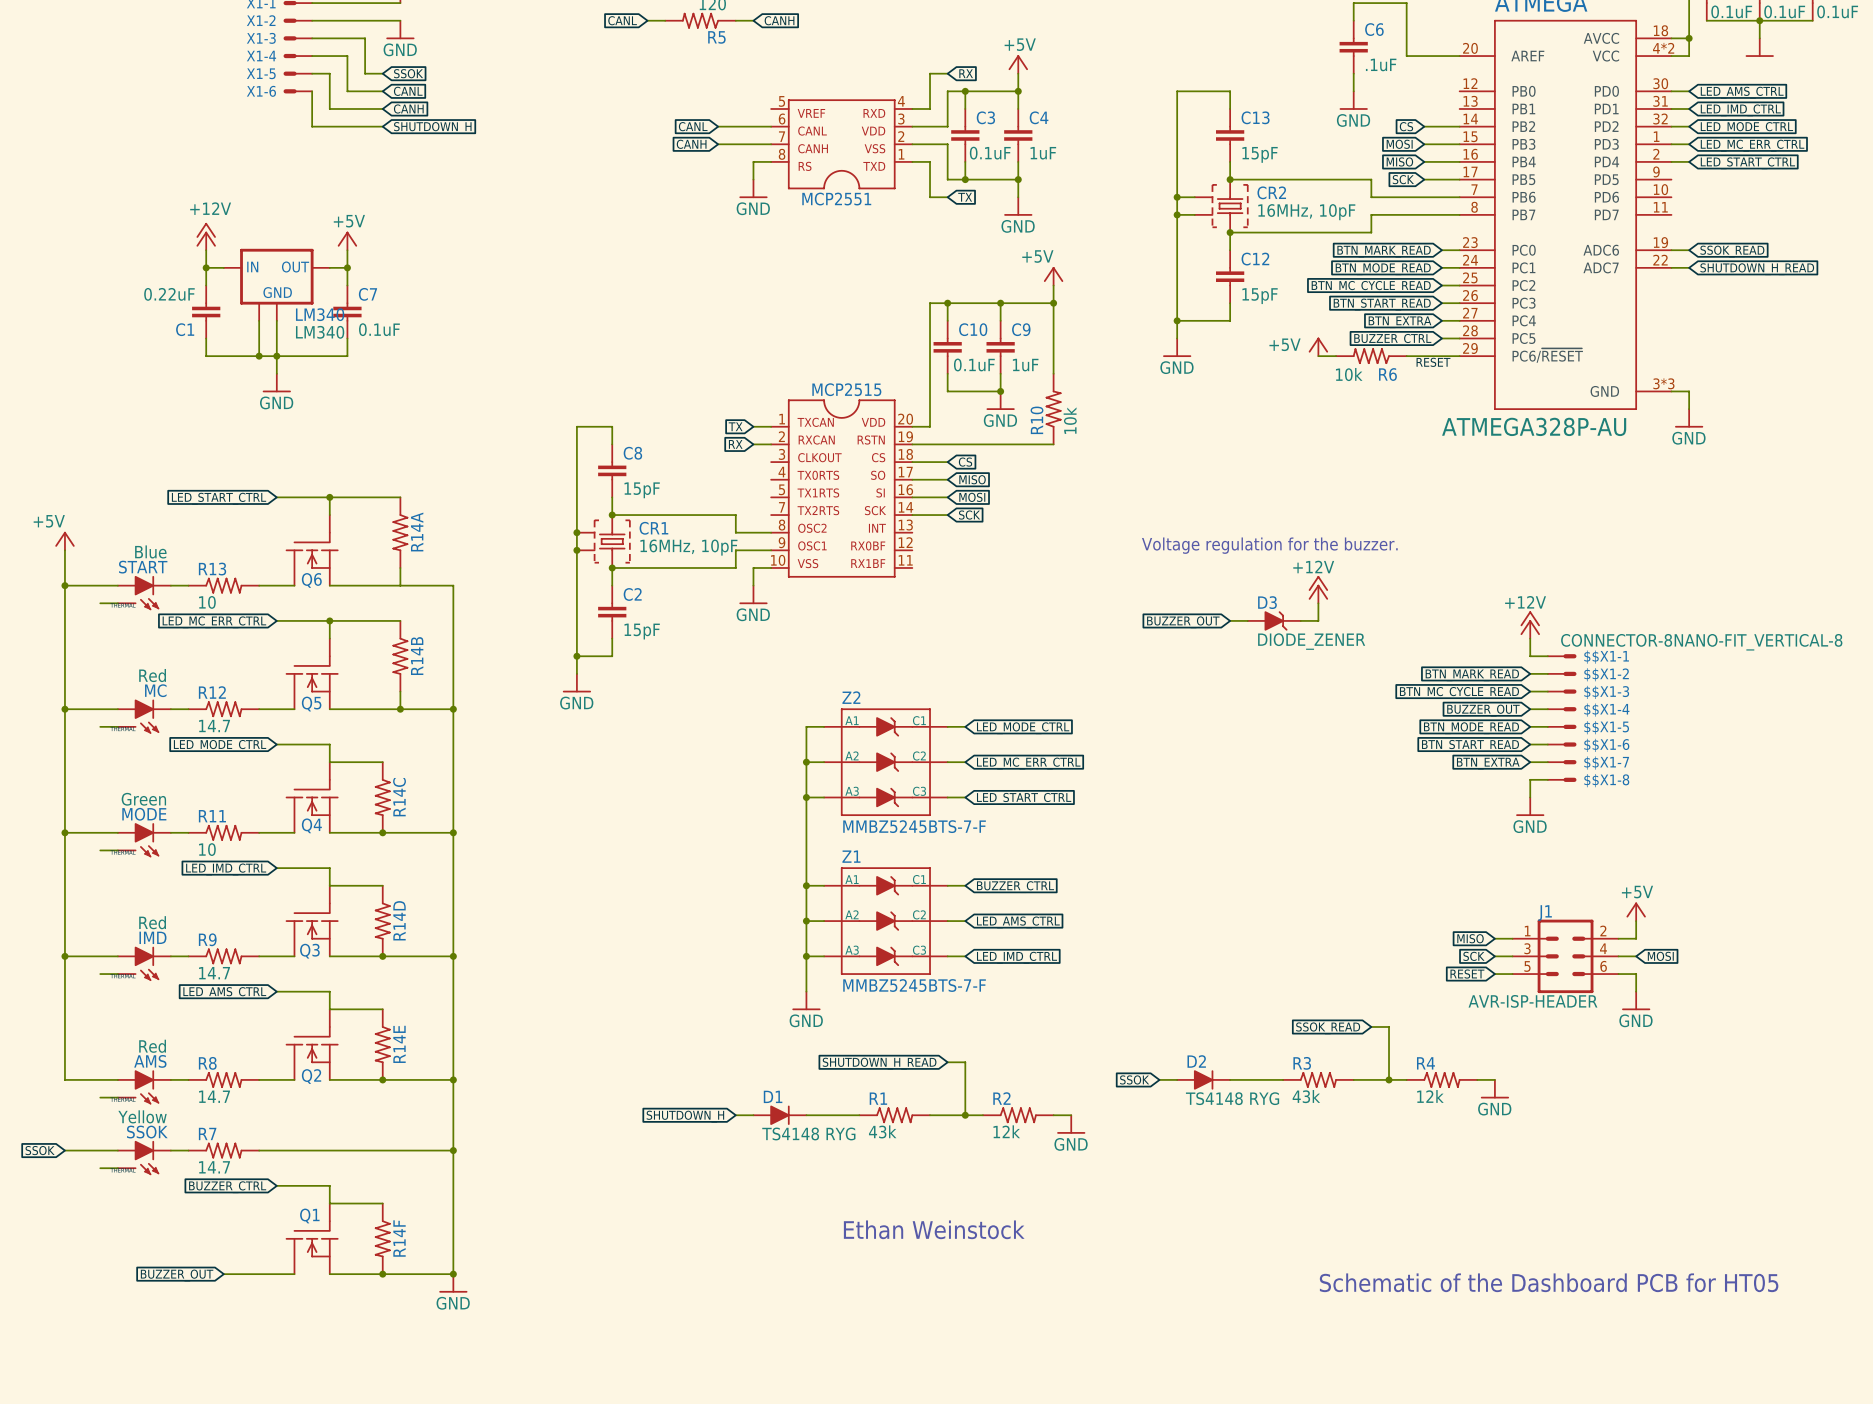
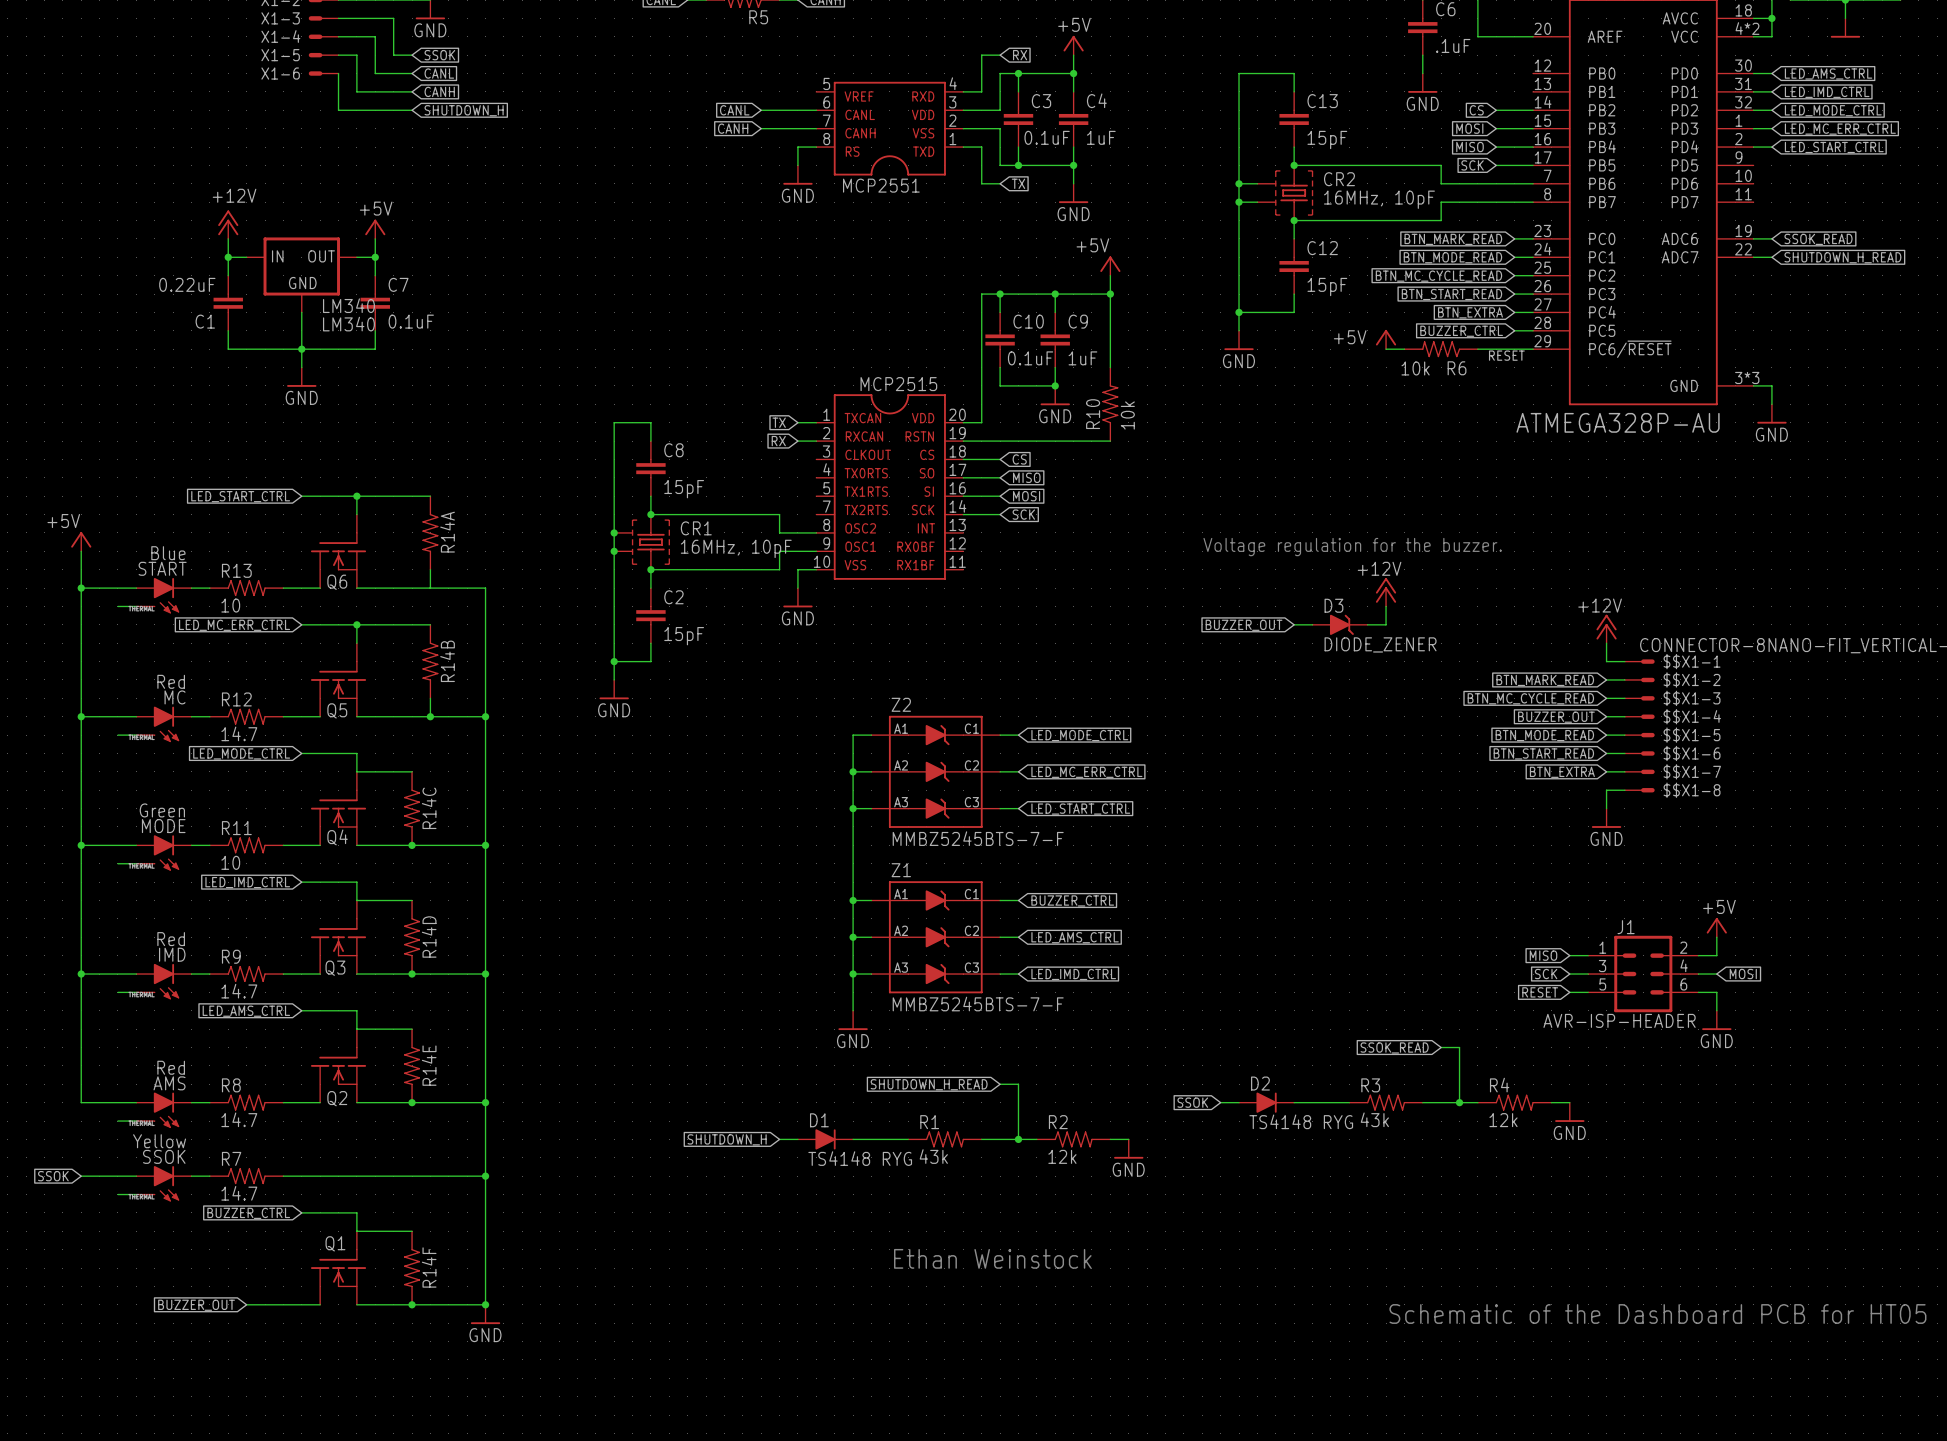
LM340 symbol: [223, 248, 330, 321] -> [246, 237, 357, 313]
wire: (259, 320) (259, 356) -> none
junction: (259, 356) -> none

